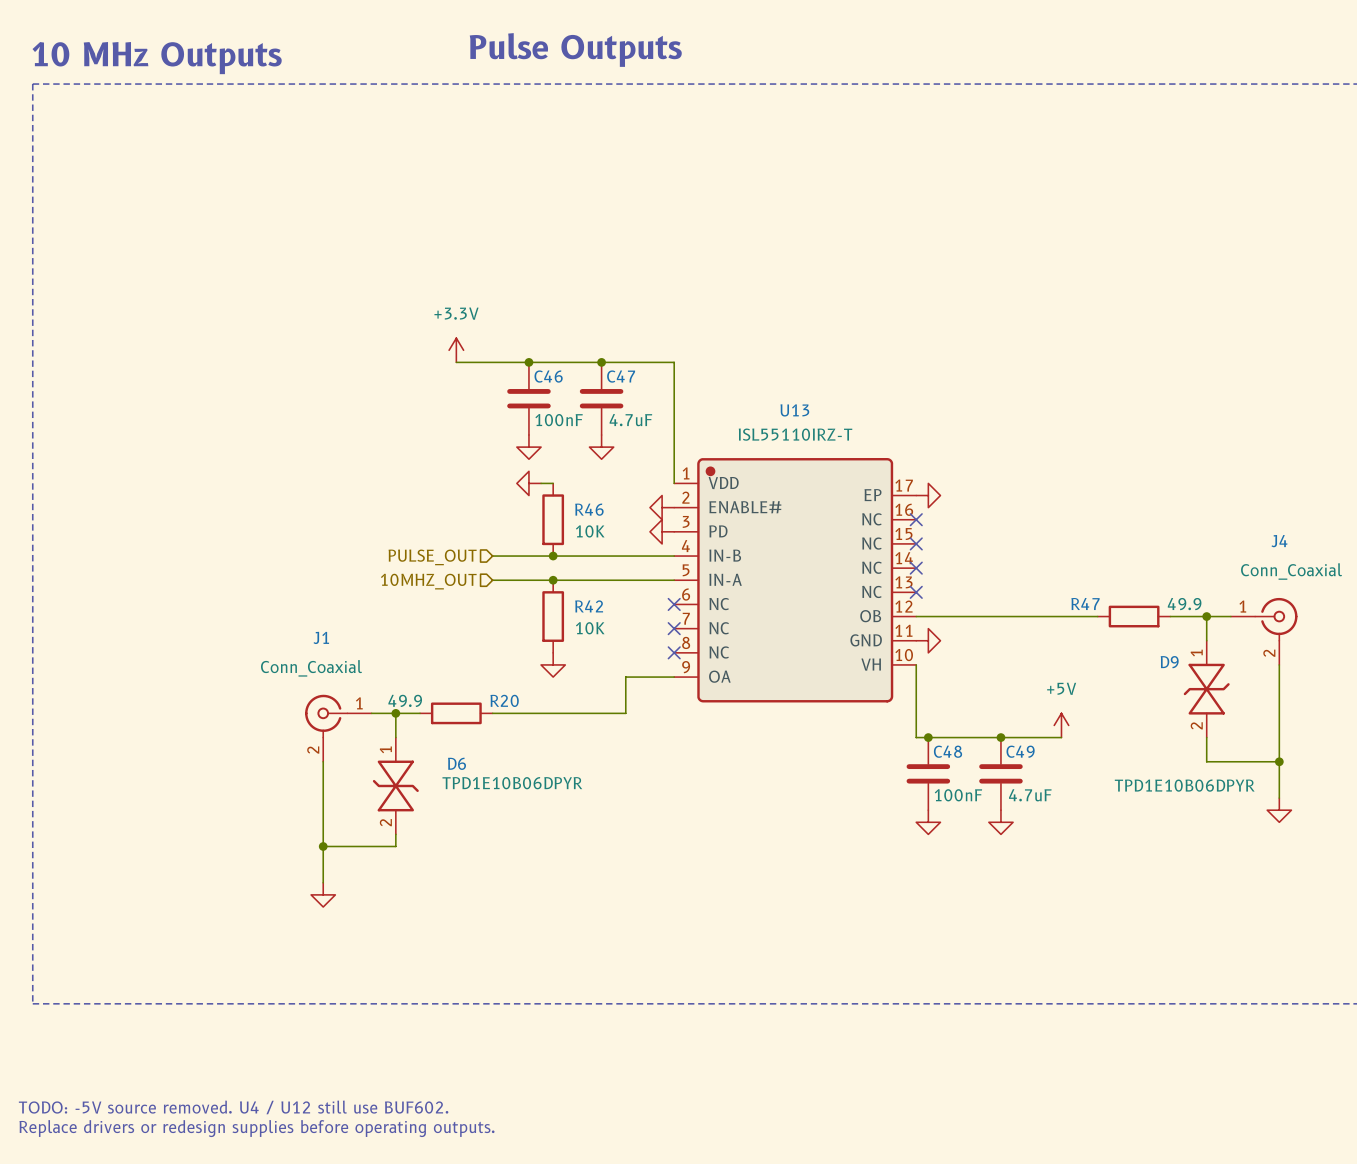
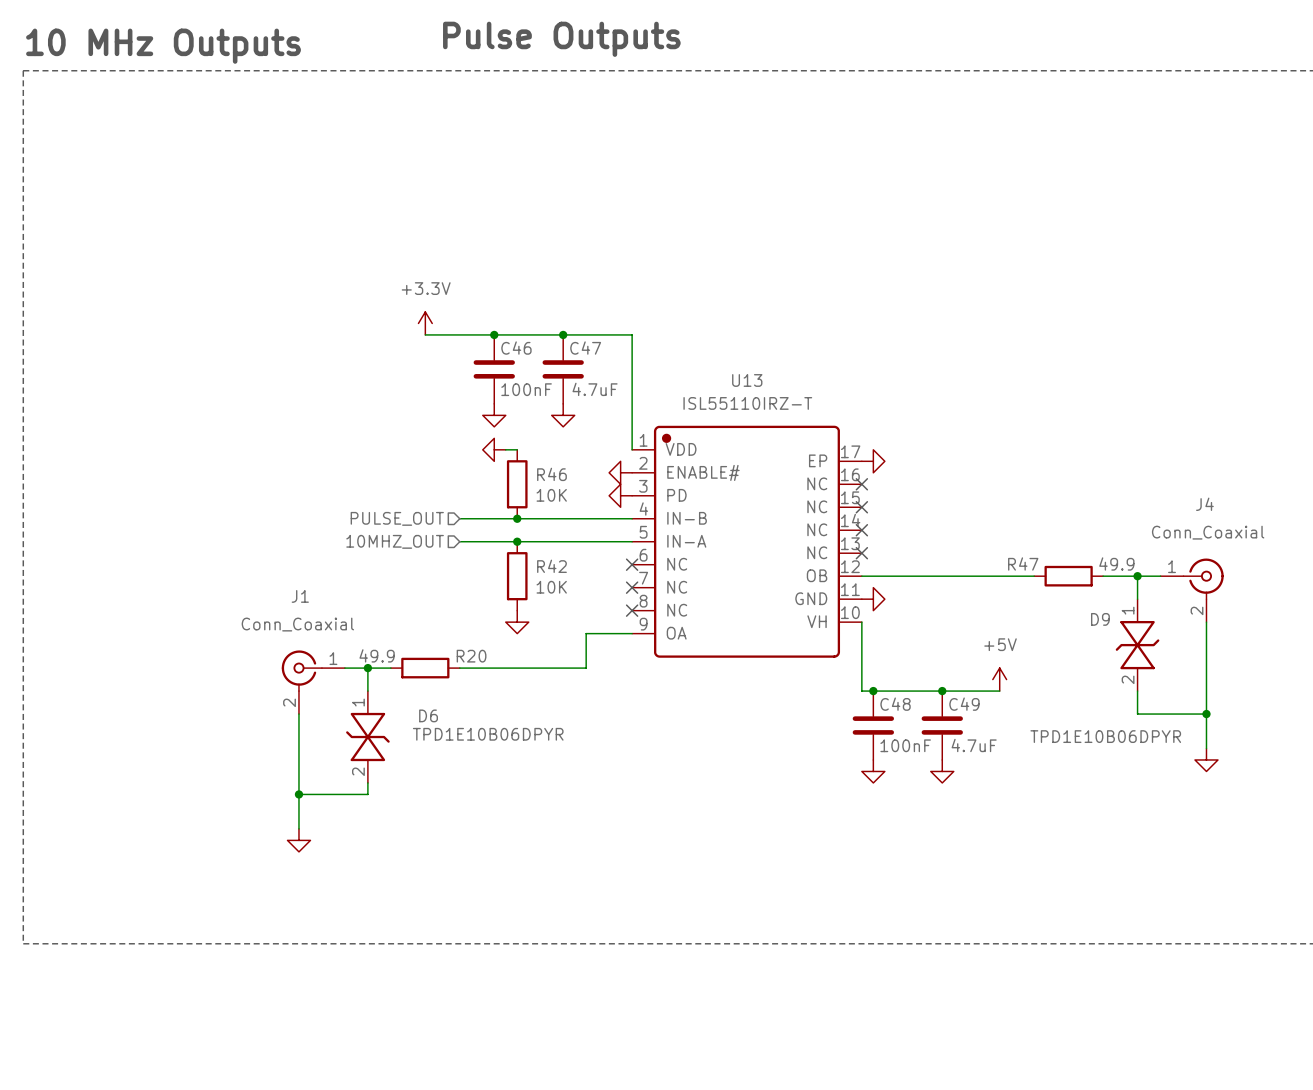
text: TODO: -5V source removed. U4 / U12 still use BUF602. (233, 1107) -> none
text: Replace drivers or redesign supplies before operating outputs. (256, 1128) -> none

